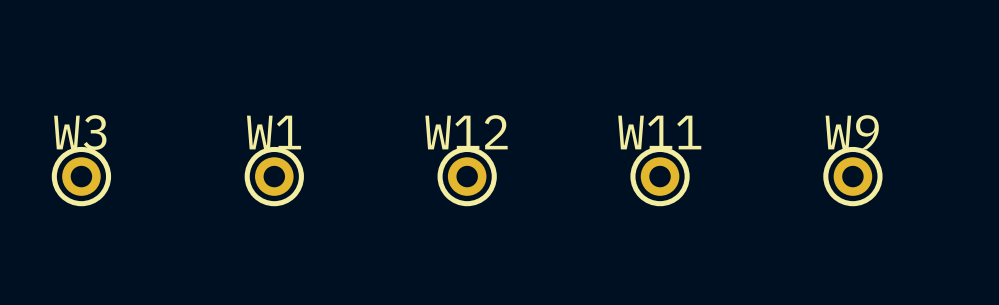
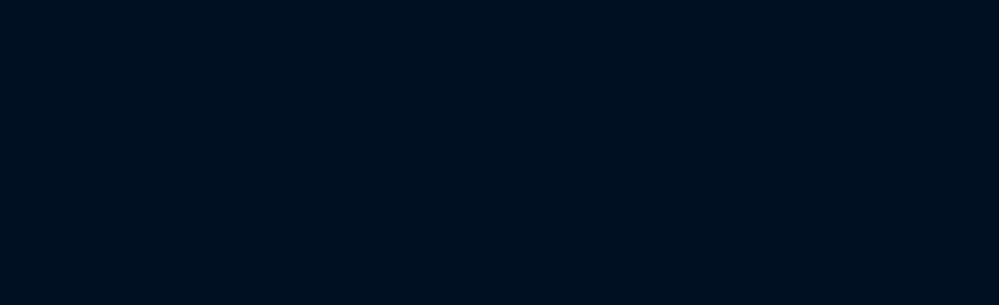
W3: (81, 176) -> none
W1: (274, 176) -> none
W12: (467, 176) -> none
W11: (660, 176) -> none
W9: (852, 176) -> none

